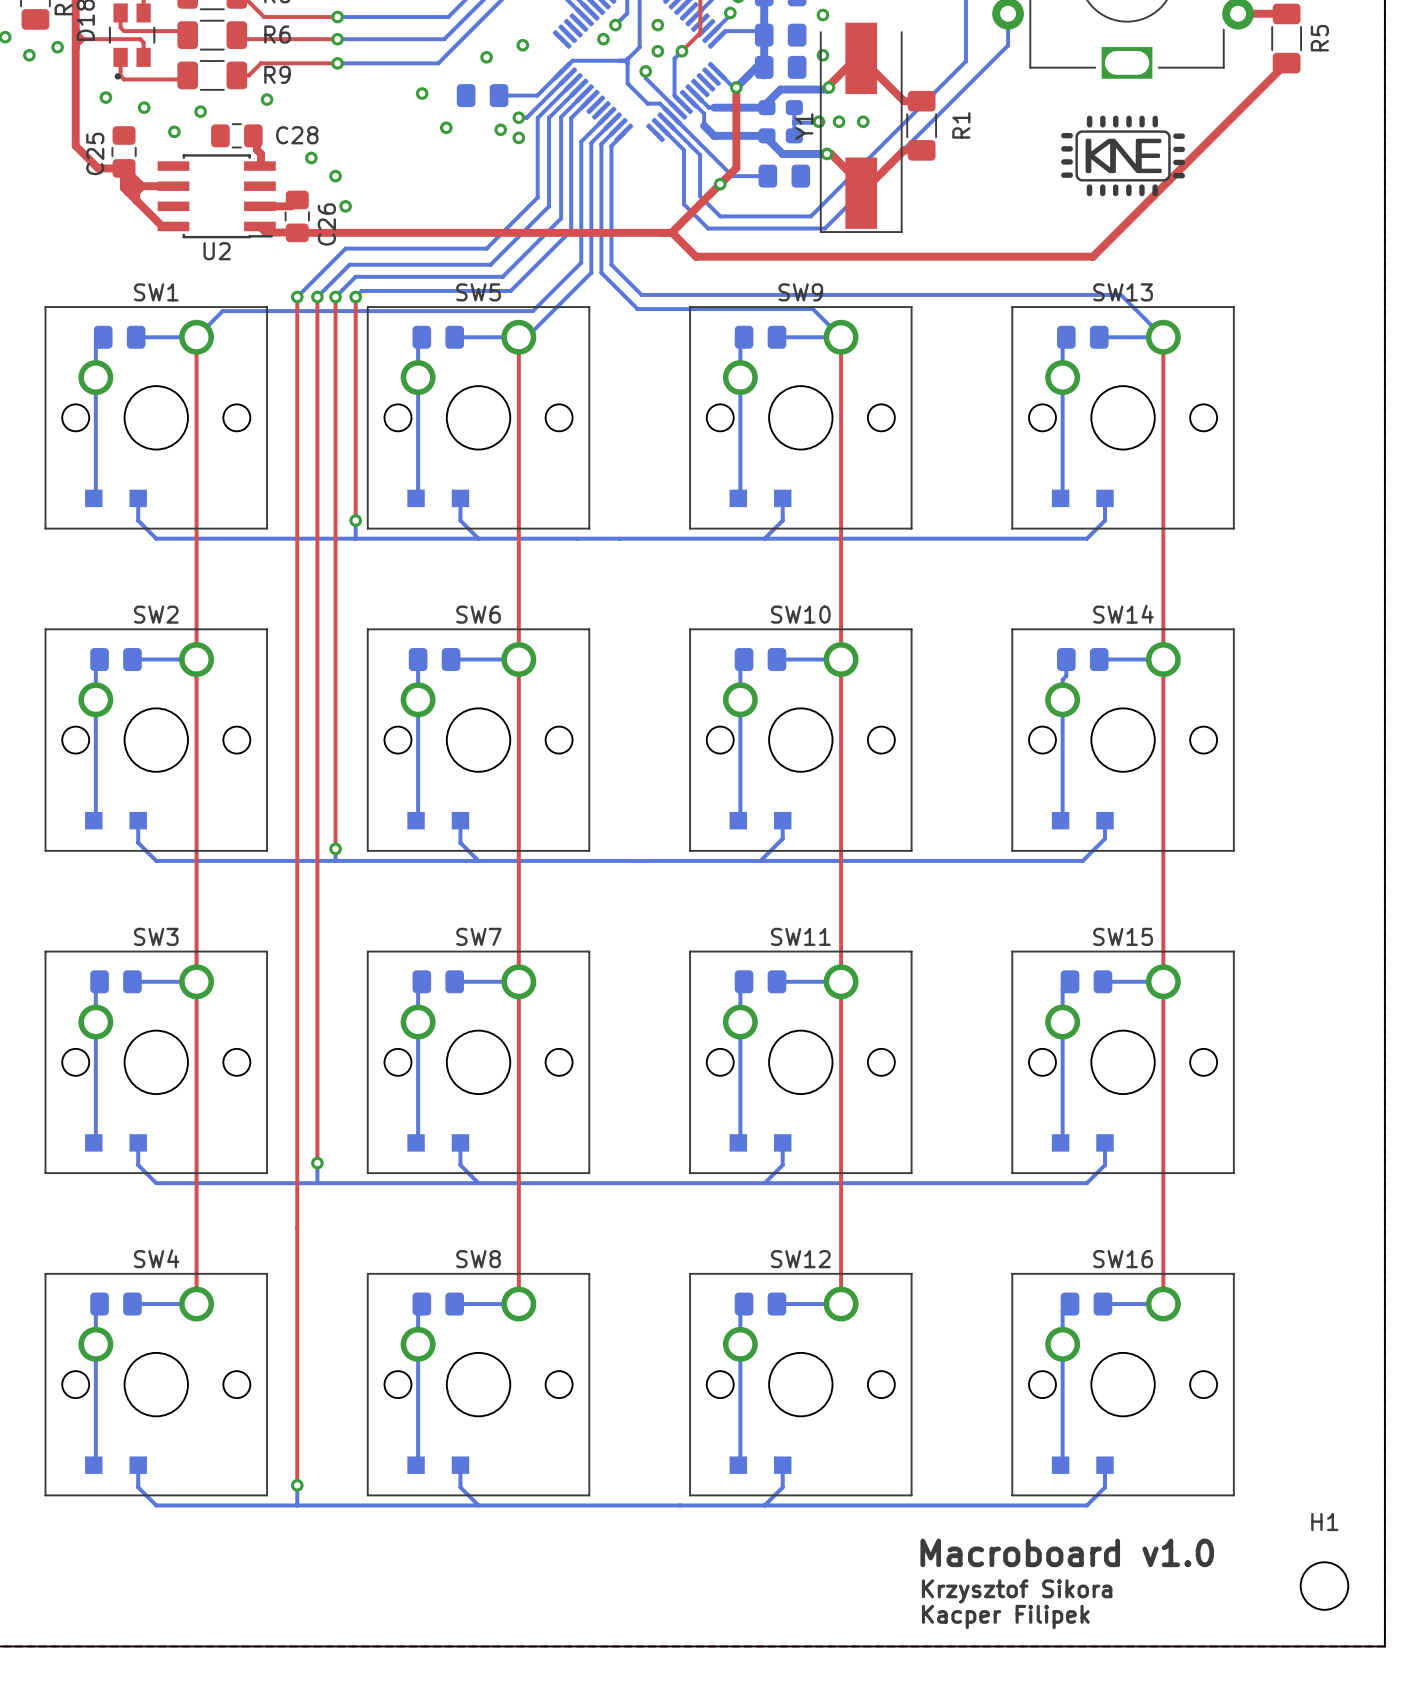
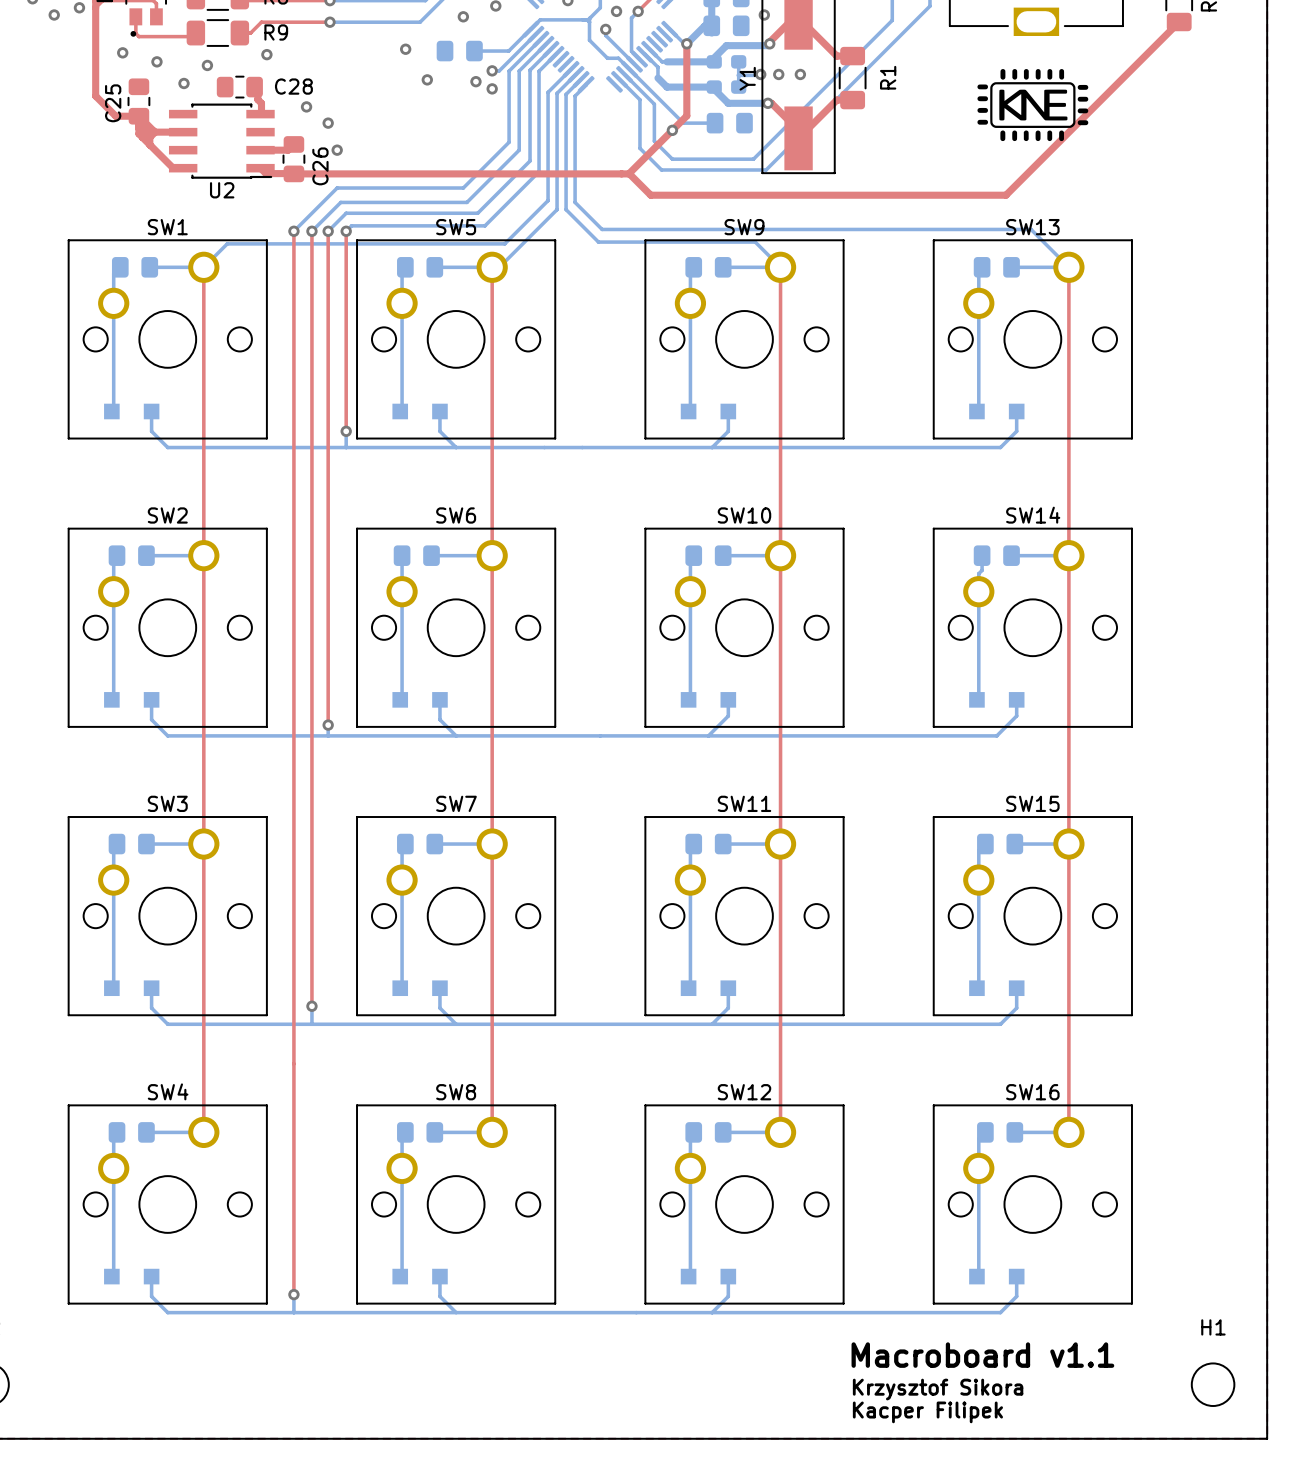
text: Macroboard v1.0 (1067, 1552) -> Macroboard v1.1 (982, 1355)

